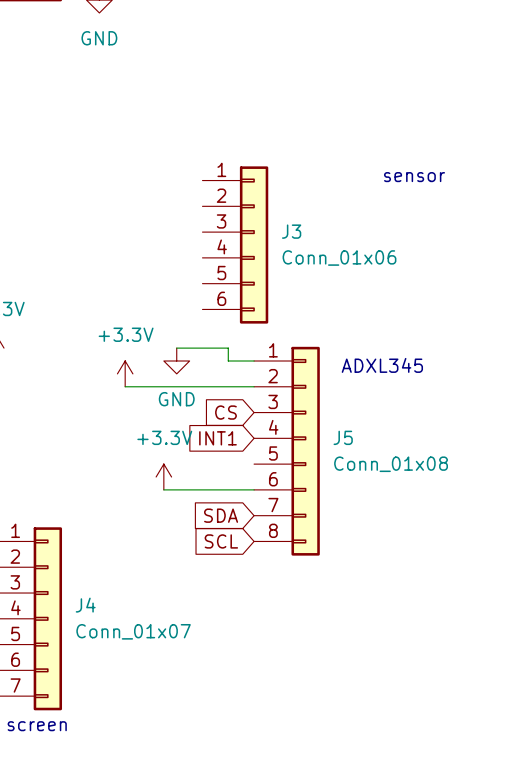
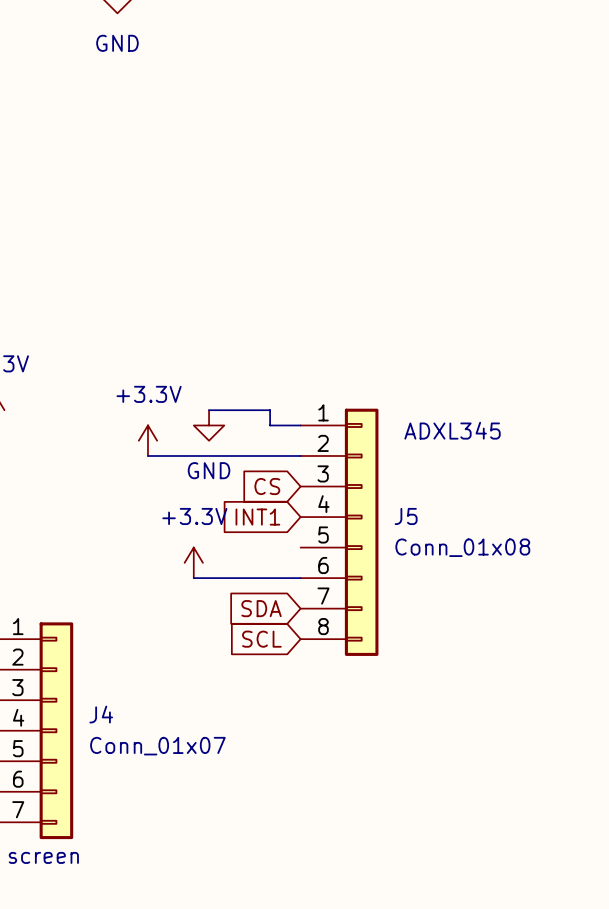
text: sensor (414, 177) -> none
J3: Conn_01x06 (235, 244) -> none

